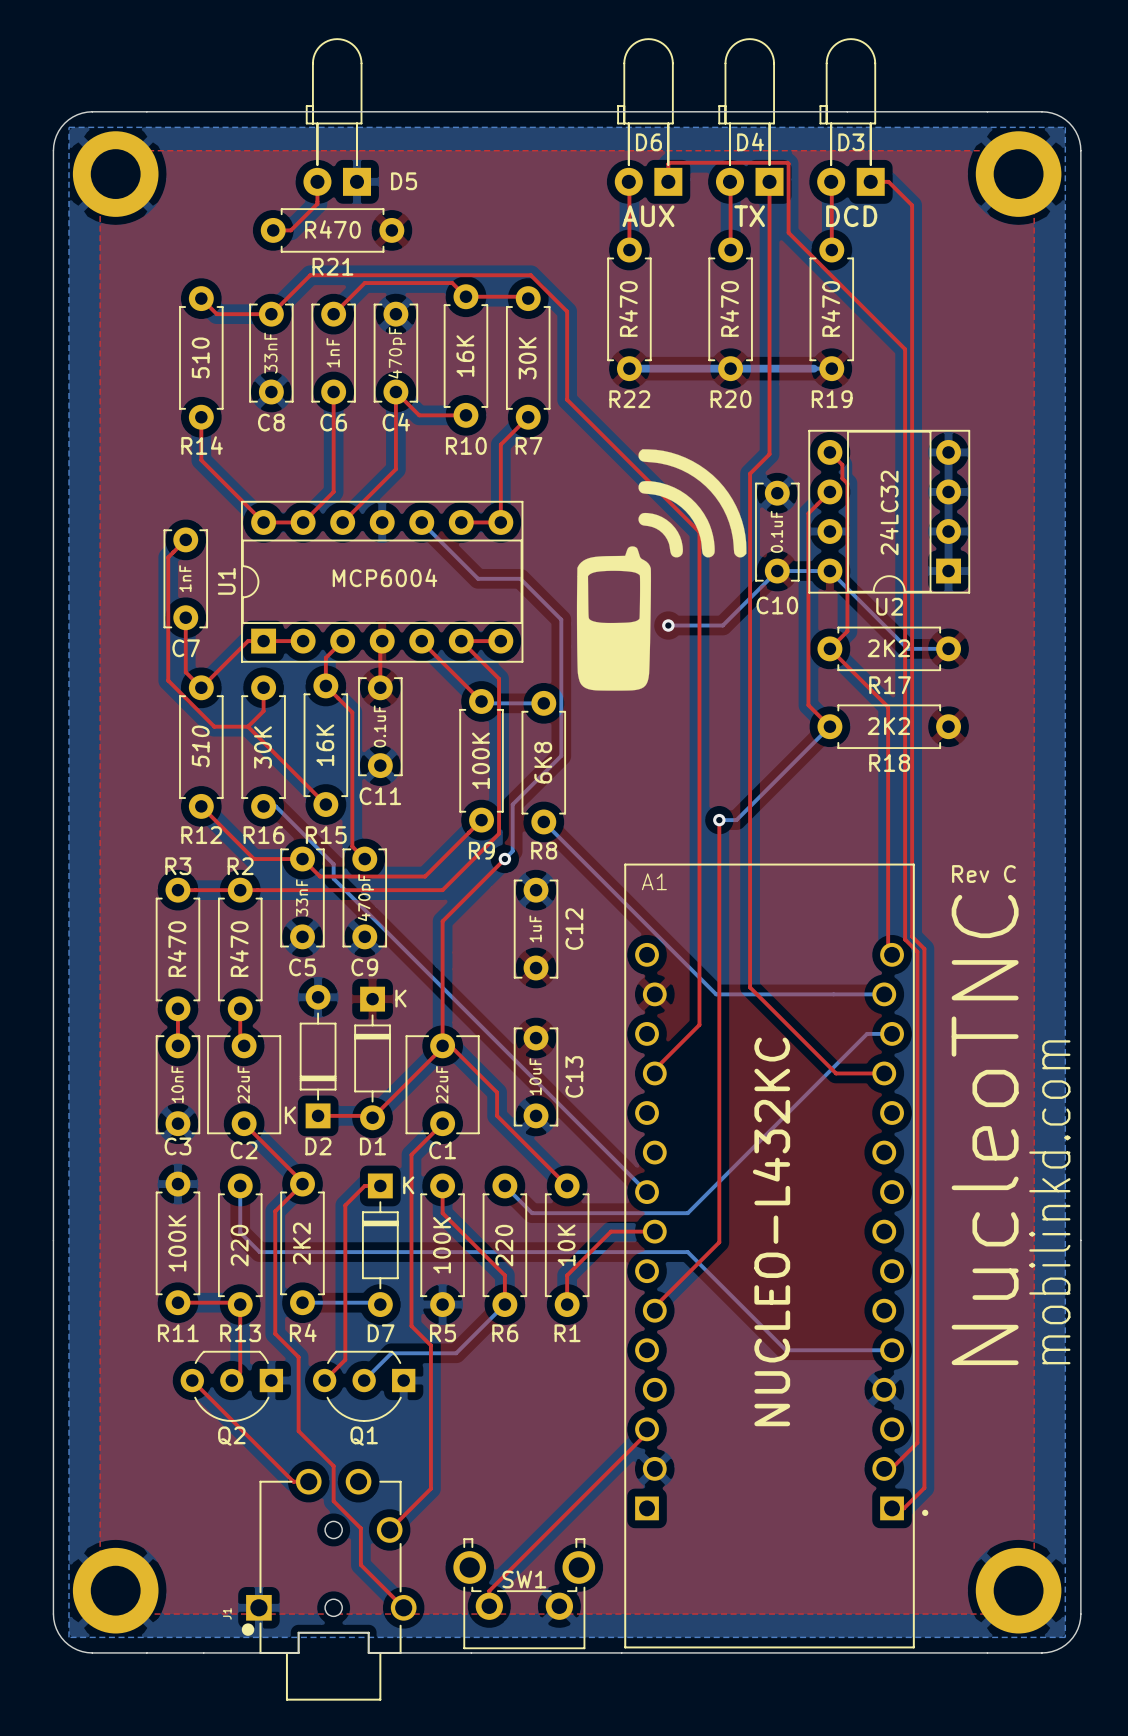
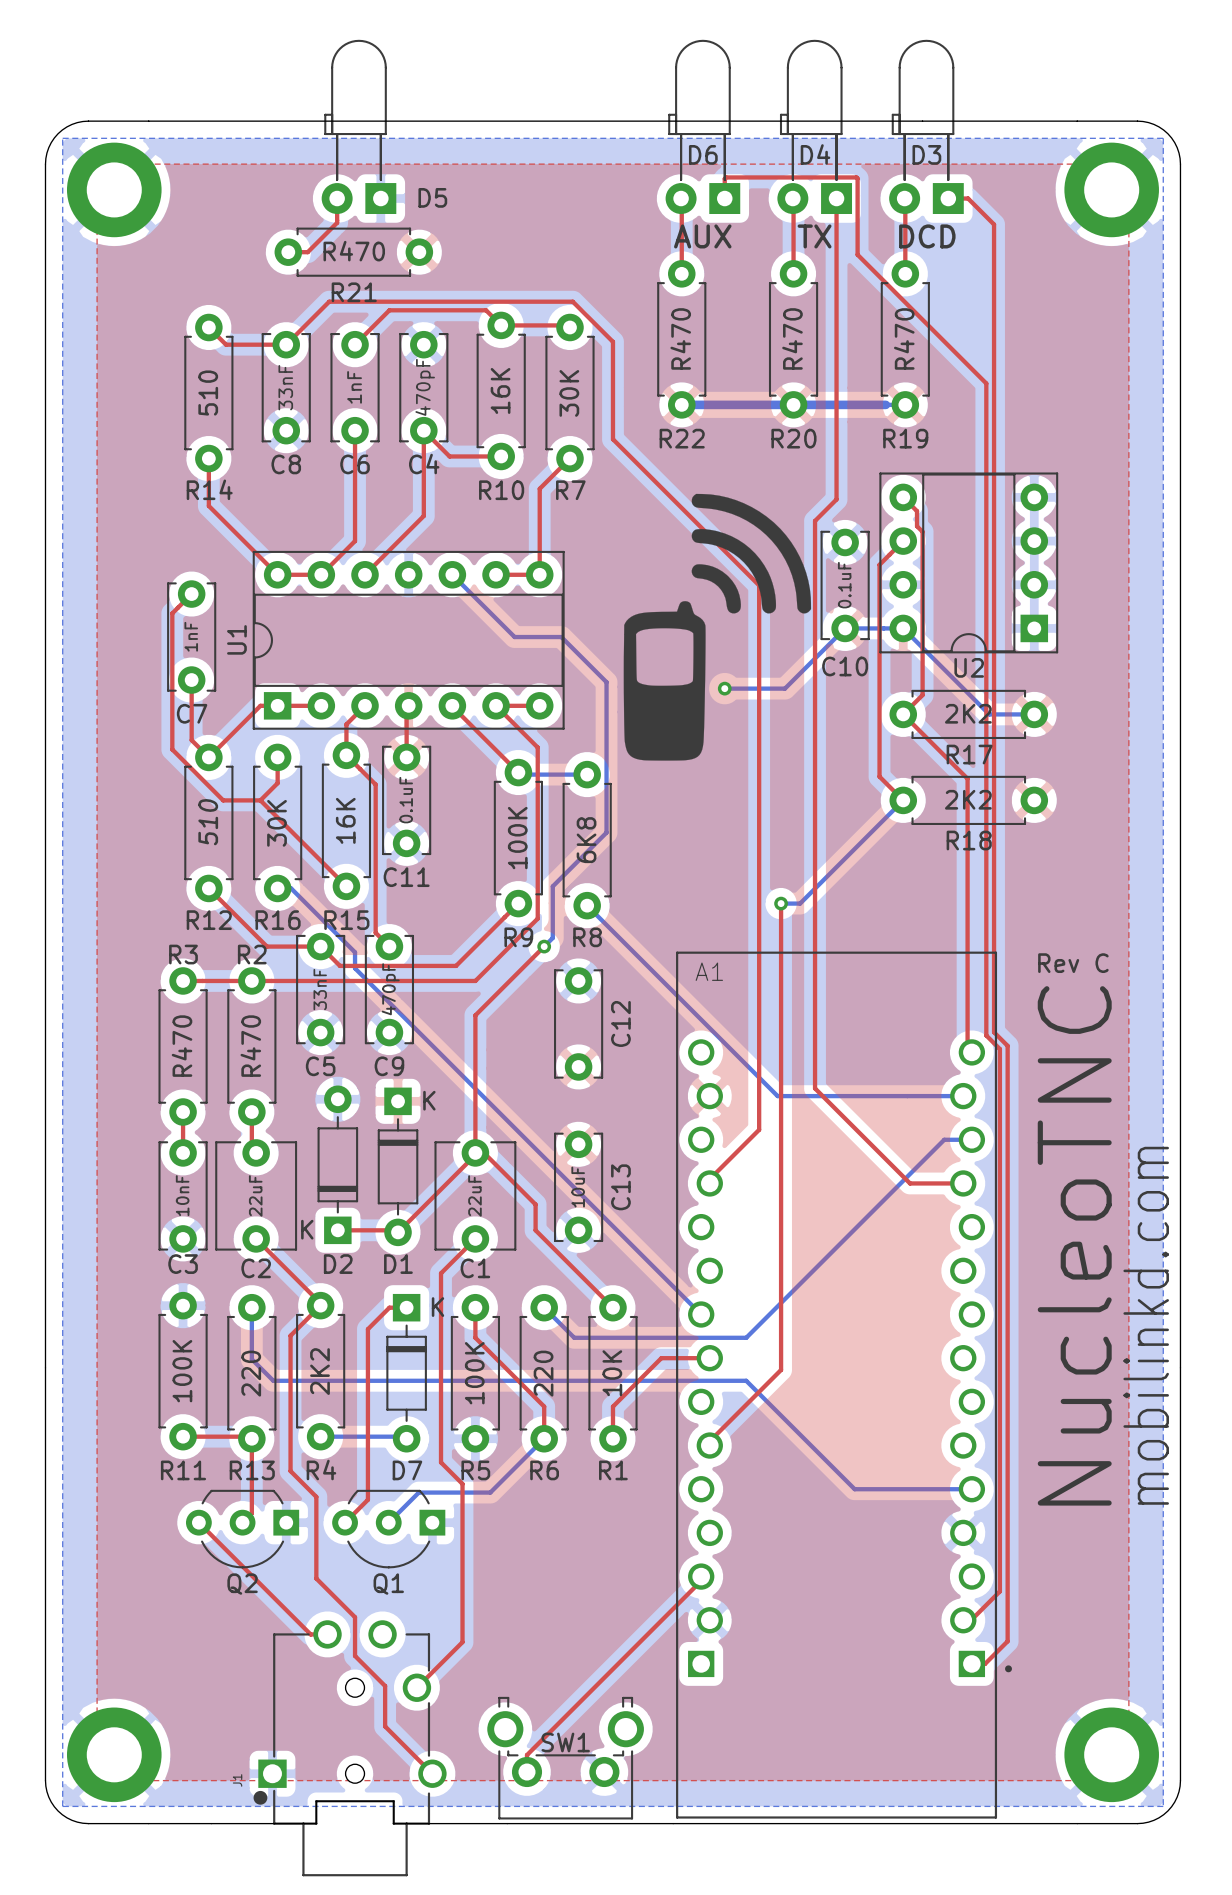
U2 value: 24LC32 (889, 513) -> none
U1 value: MCP6004 (384, 577) -> none
C12 value: 1uF (535, 928) -> none
A1 value: NUCLEO-L432KC (771, 1231) -> none

